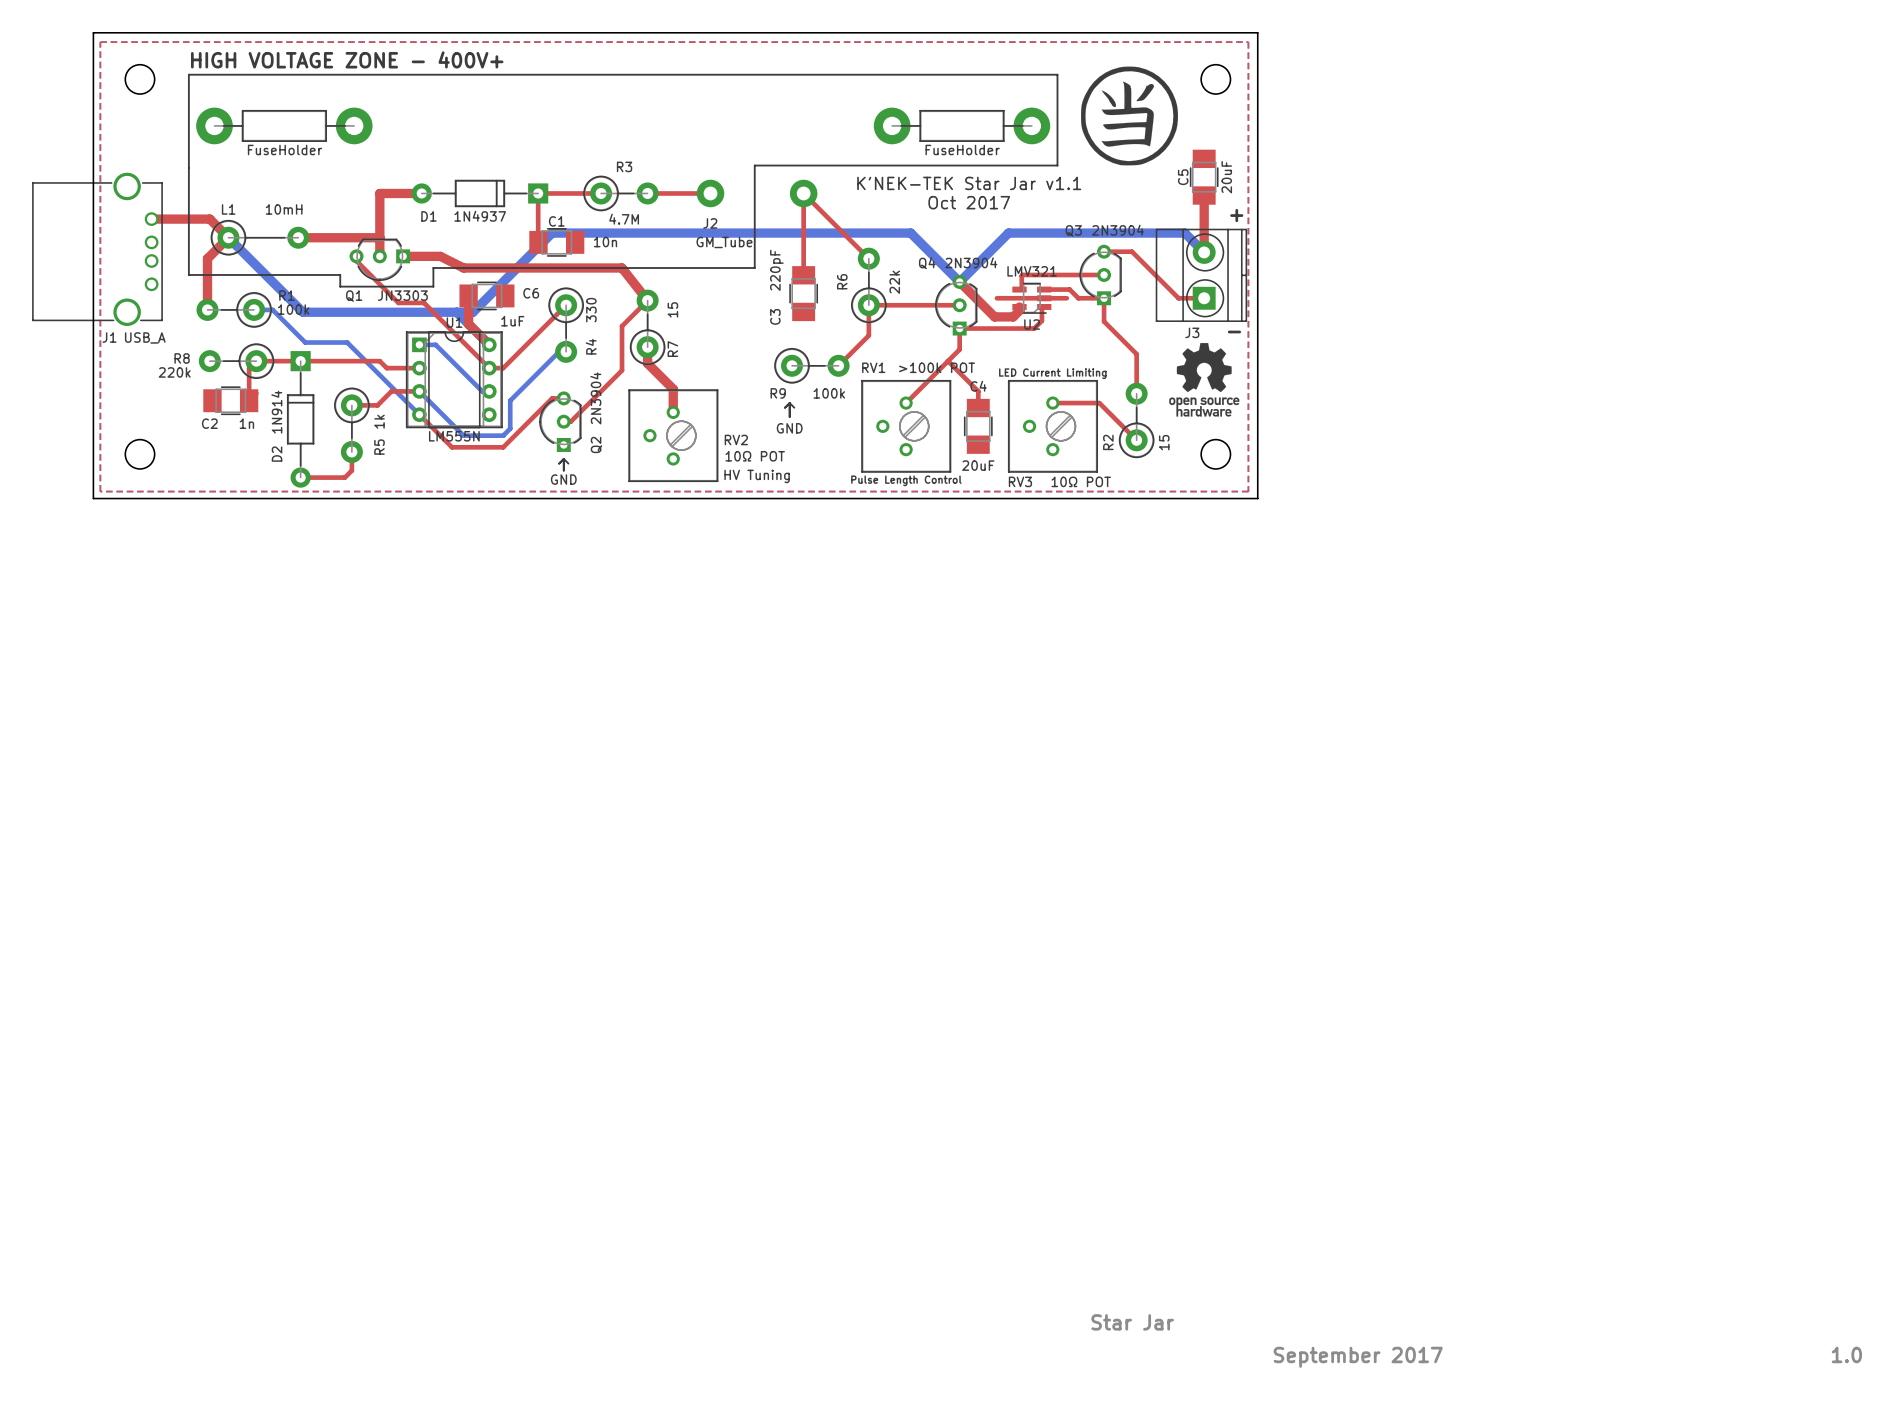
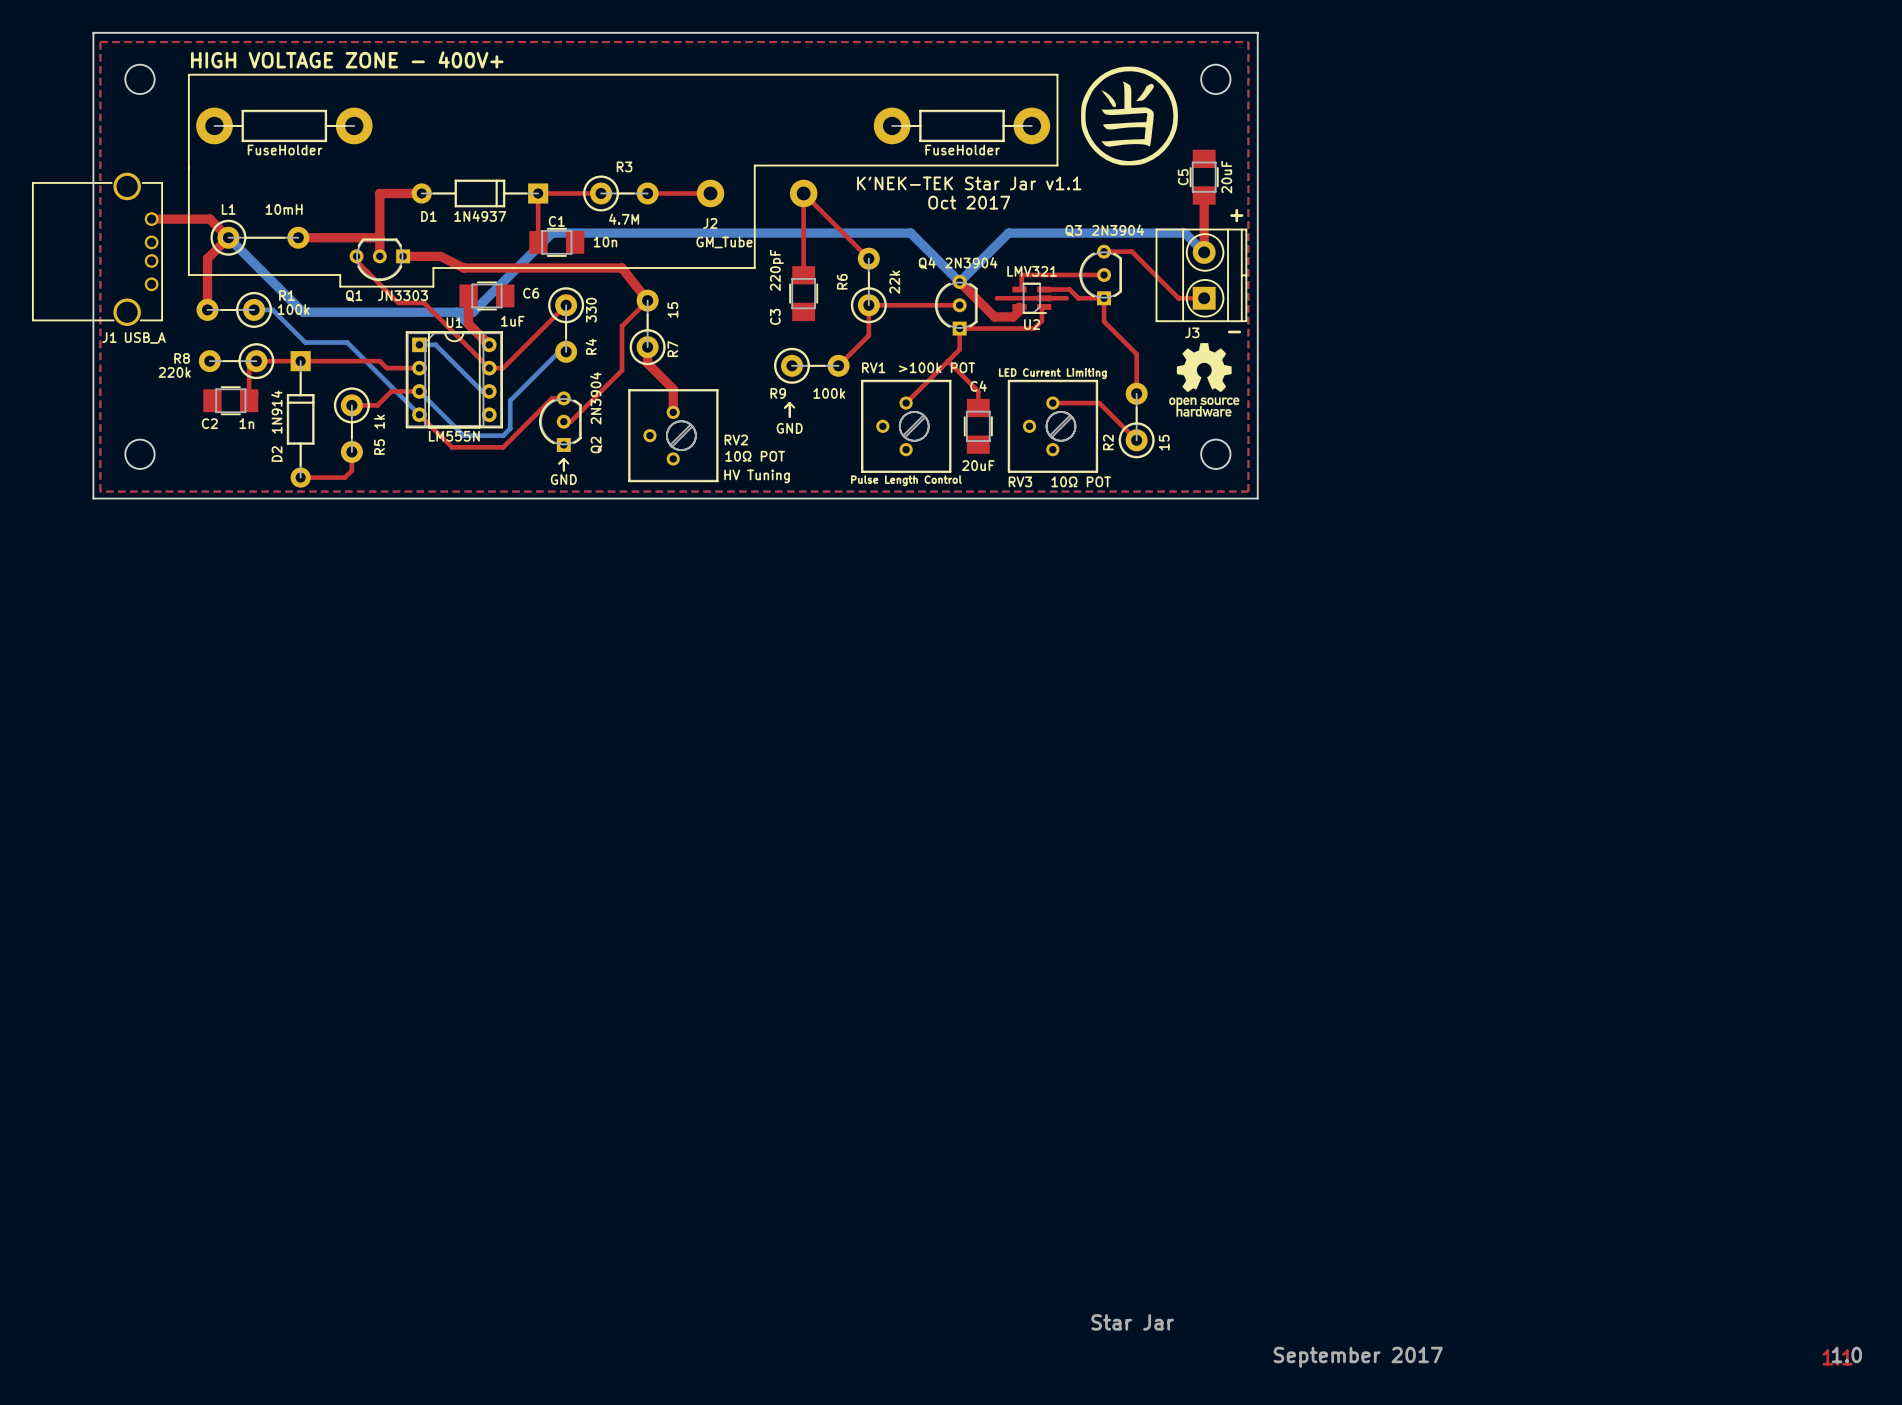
text: none -> 1.1 (1837, 1357)

